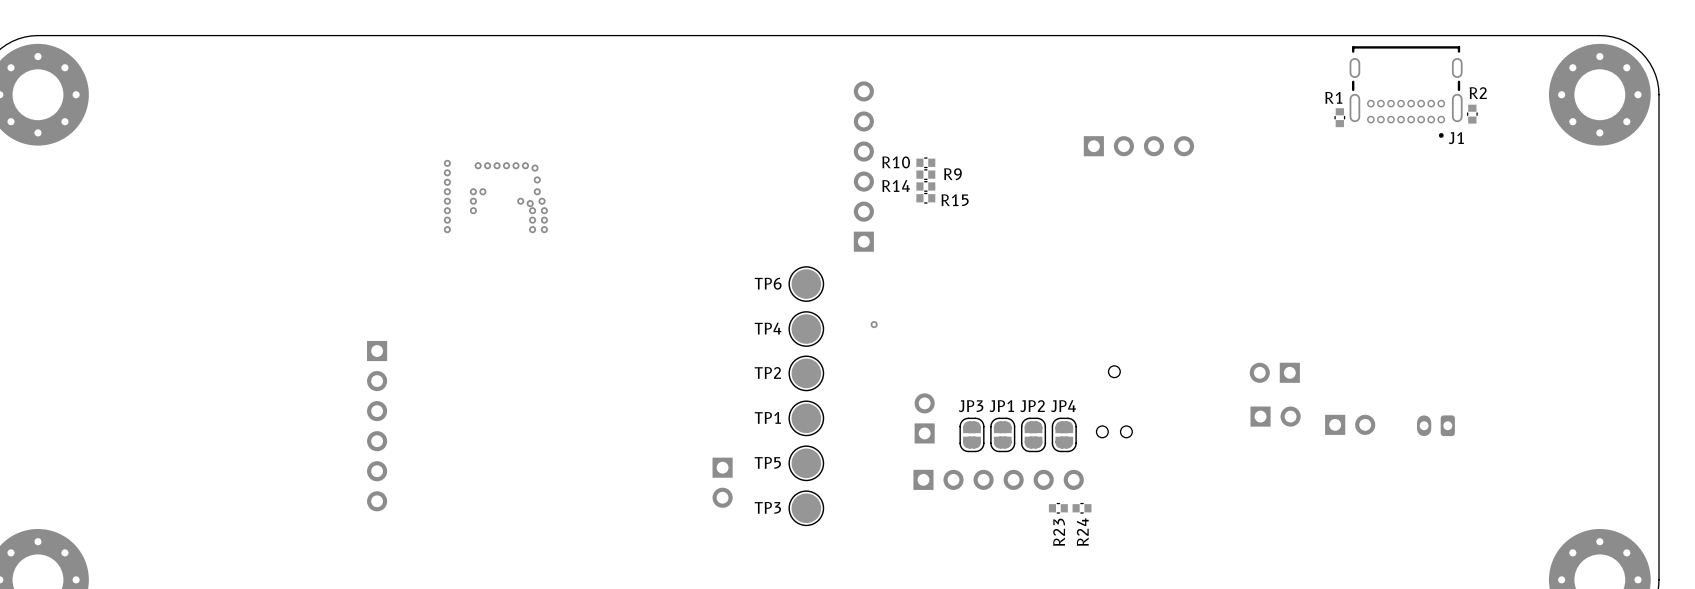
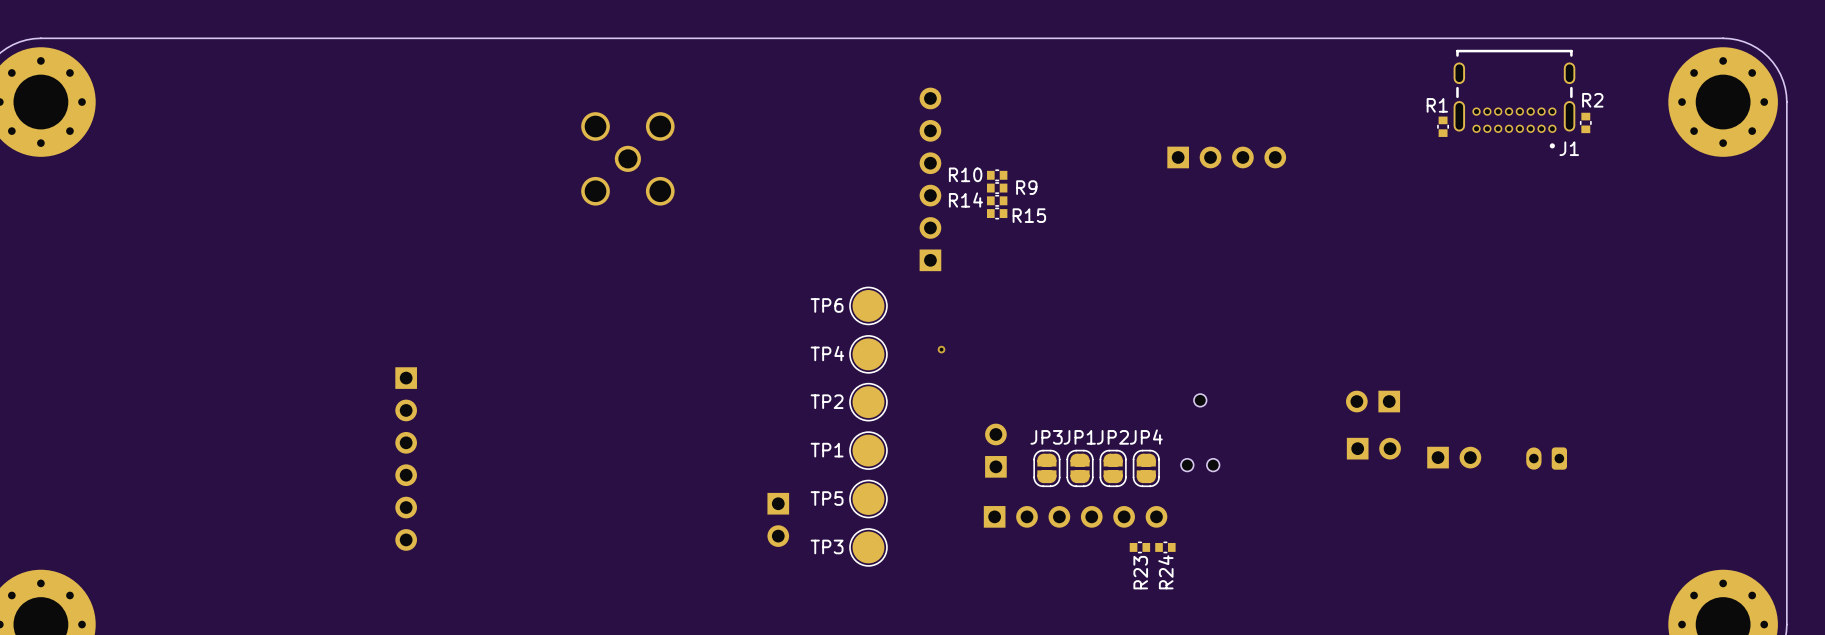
part: none -> (627, 158)
via: (447, 163) -> none
via: (478, 165) -> none
via: (487, 165) -> none
via: (497, 165) -> none
via: (506, 165) -> none
via: (516, 165) -> none
via: (525, 165) -> none
via: (535, 168) -> none
via: (447, 172) -> none
via: (537, 179) -> none
via: (447, 182) -> none
via: (447, 191) -> none
via: (473, 191) -> none
via: (482, 191) -> none
via: (537, 191) -> none
via: (447, 201) -> none
via: (473, 201) -> none
via: (520, 201) -> none
via: (542, 201) -> none
via: (530, 203) -> none
via: (447, 210) -> none
via: (473, 210) -> none
via: (532, 210) -> none
via: (544, 210) -> none
via: (447, 220) -> none
via: (532, 220) -> none
via: (544, 220) -> none
via: (447, 229) -> none
via: (532, 229) -> none
via: (544, 229) -> none

